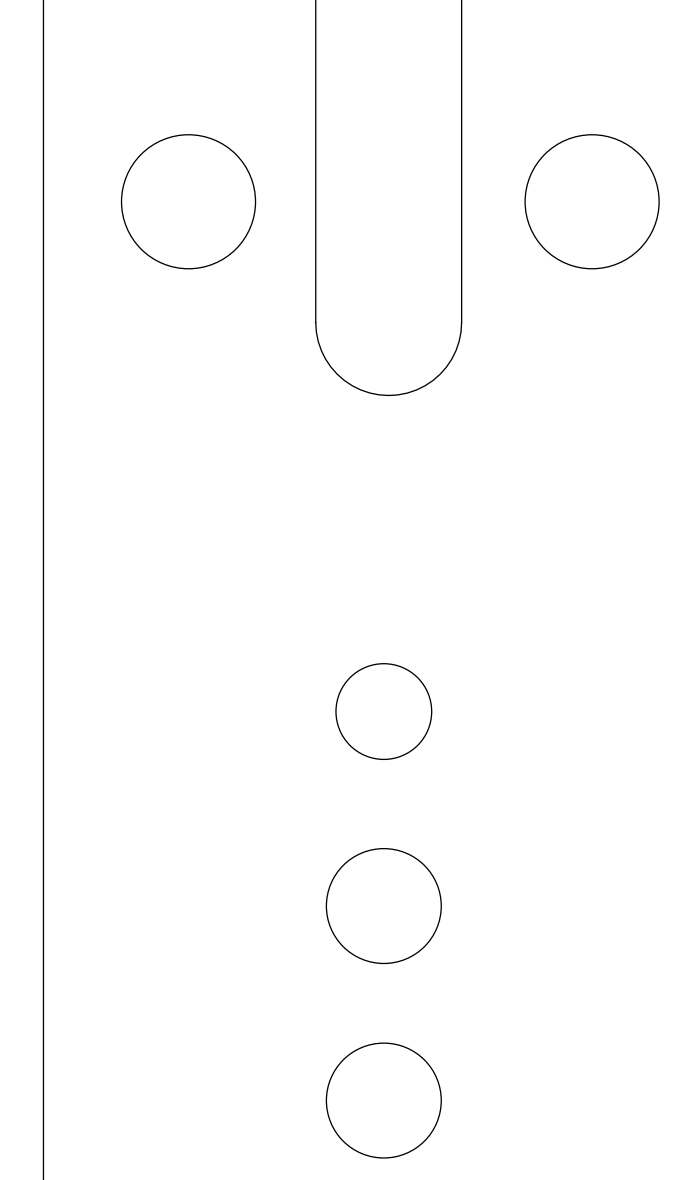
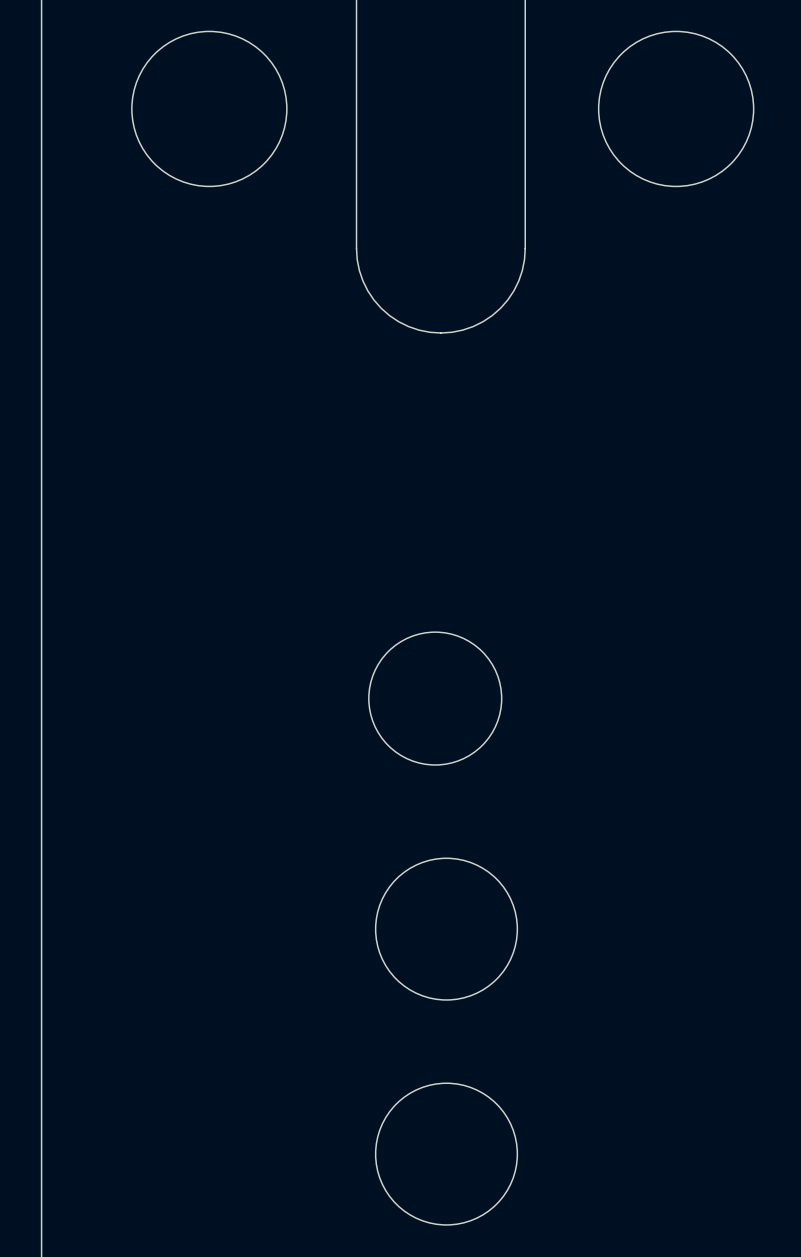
round board edge size: [335, 663, 433, 760] -> [368, 631, 503, 766]
round board edge size: [325, 848, 442, 964] -> [375, 857, 518, 1001]
round board edge size: [325, 1042, 442, 1159] -> [375, 1082, 518, 1226]

